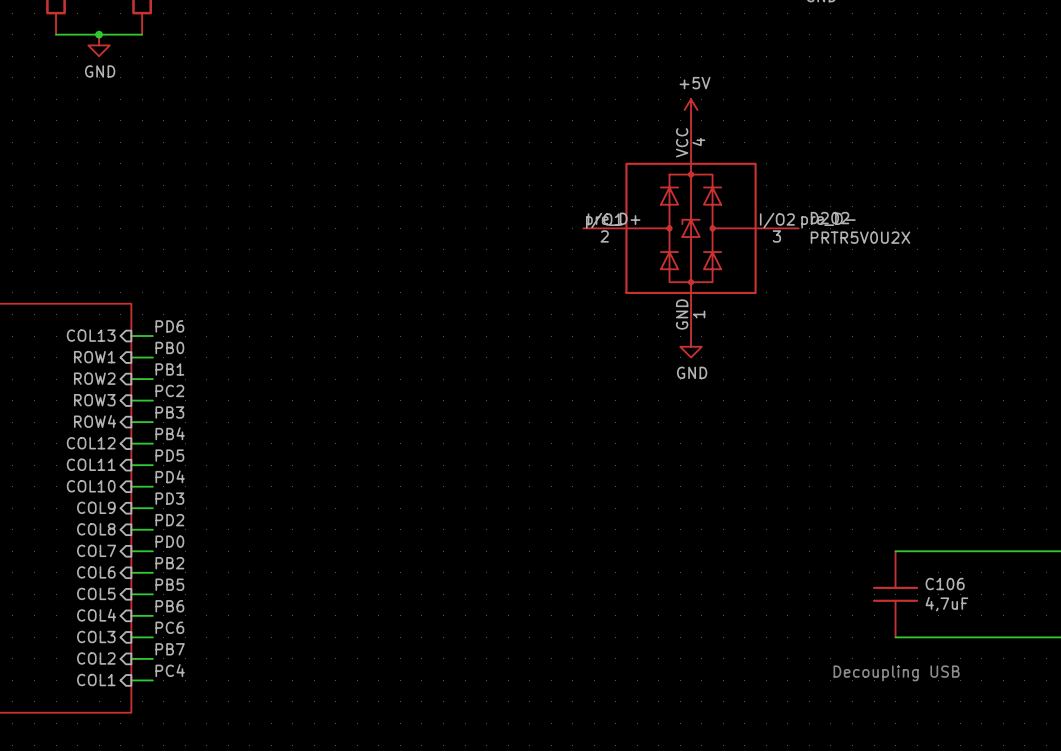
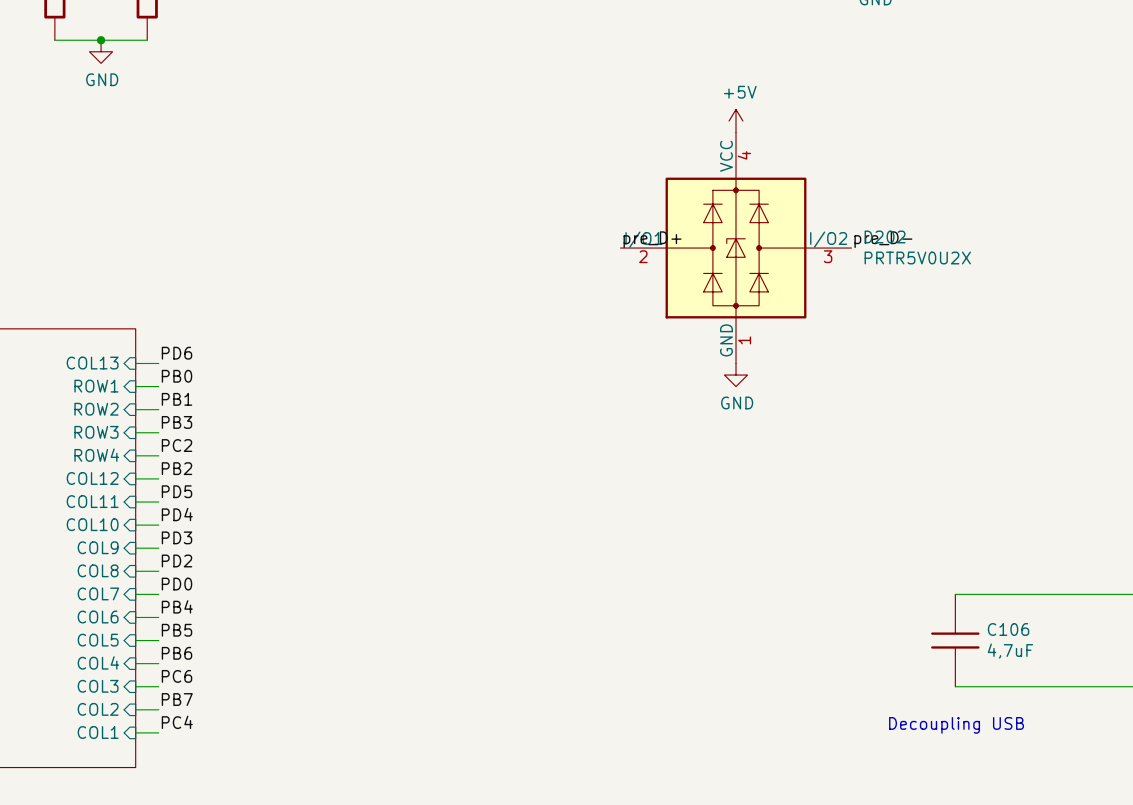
label: PC2 (169, 390) -> PB3 (177, 422)
label: PB3 (169, 412) -> PC2 (177, 445)
label: PB4 (170, 433) -> PB2 (177, 468)
label: PB2 (169, 563) -> PB4 (177, 606)

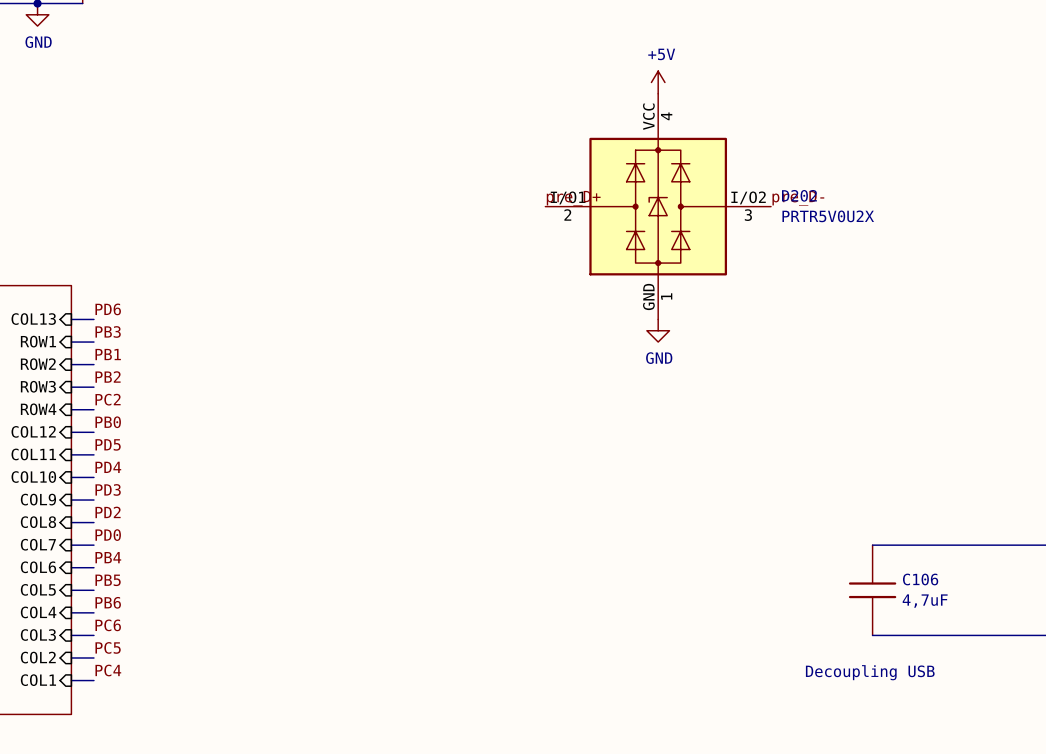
label: PB0 (177, 376) -> PB3 (108, 331)
label: PB3 (177, 422) -> PB2 (108, 377)
label: PB2 (177, 468) -> PB0 (108, 422)
label: PB7 (177, 699) -> PC5 (108, 647)

